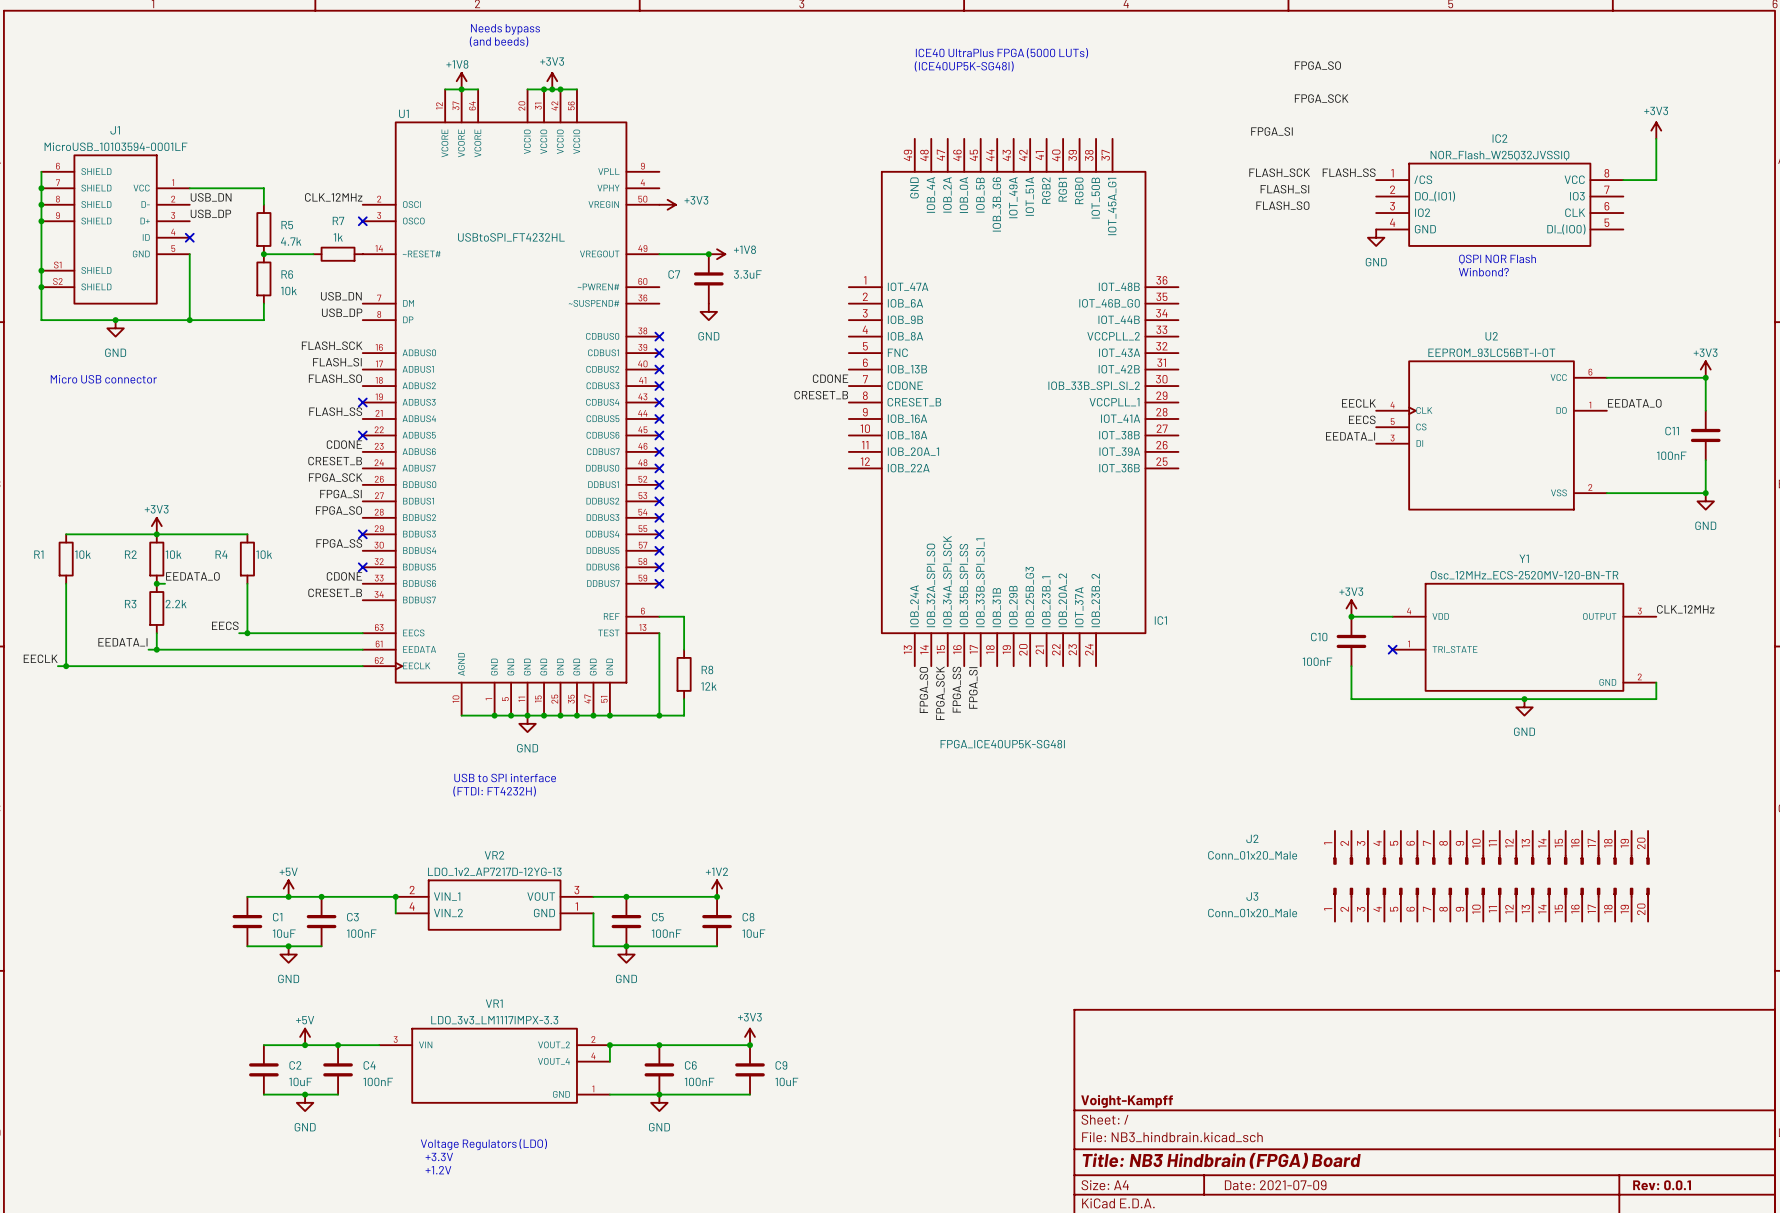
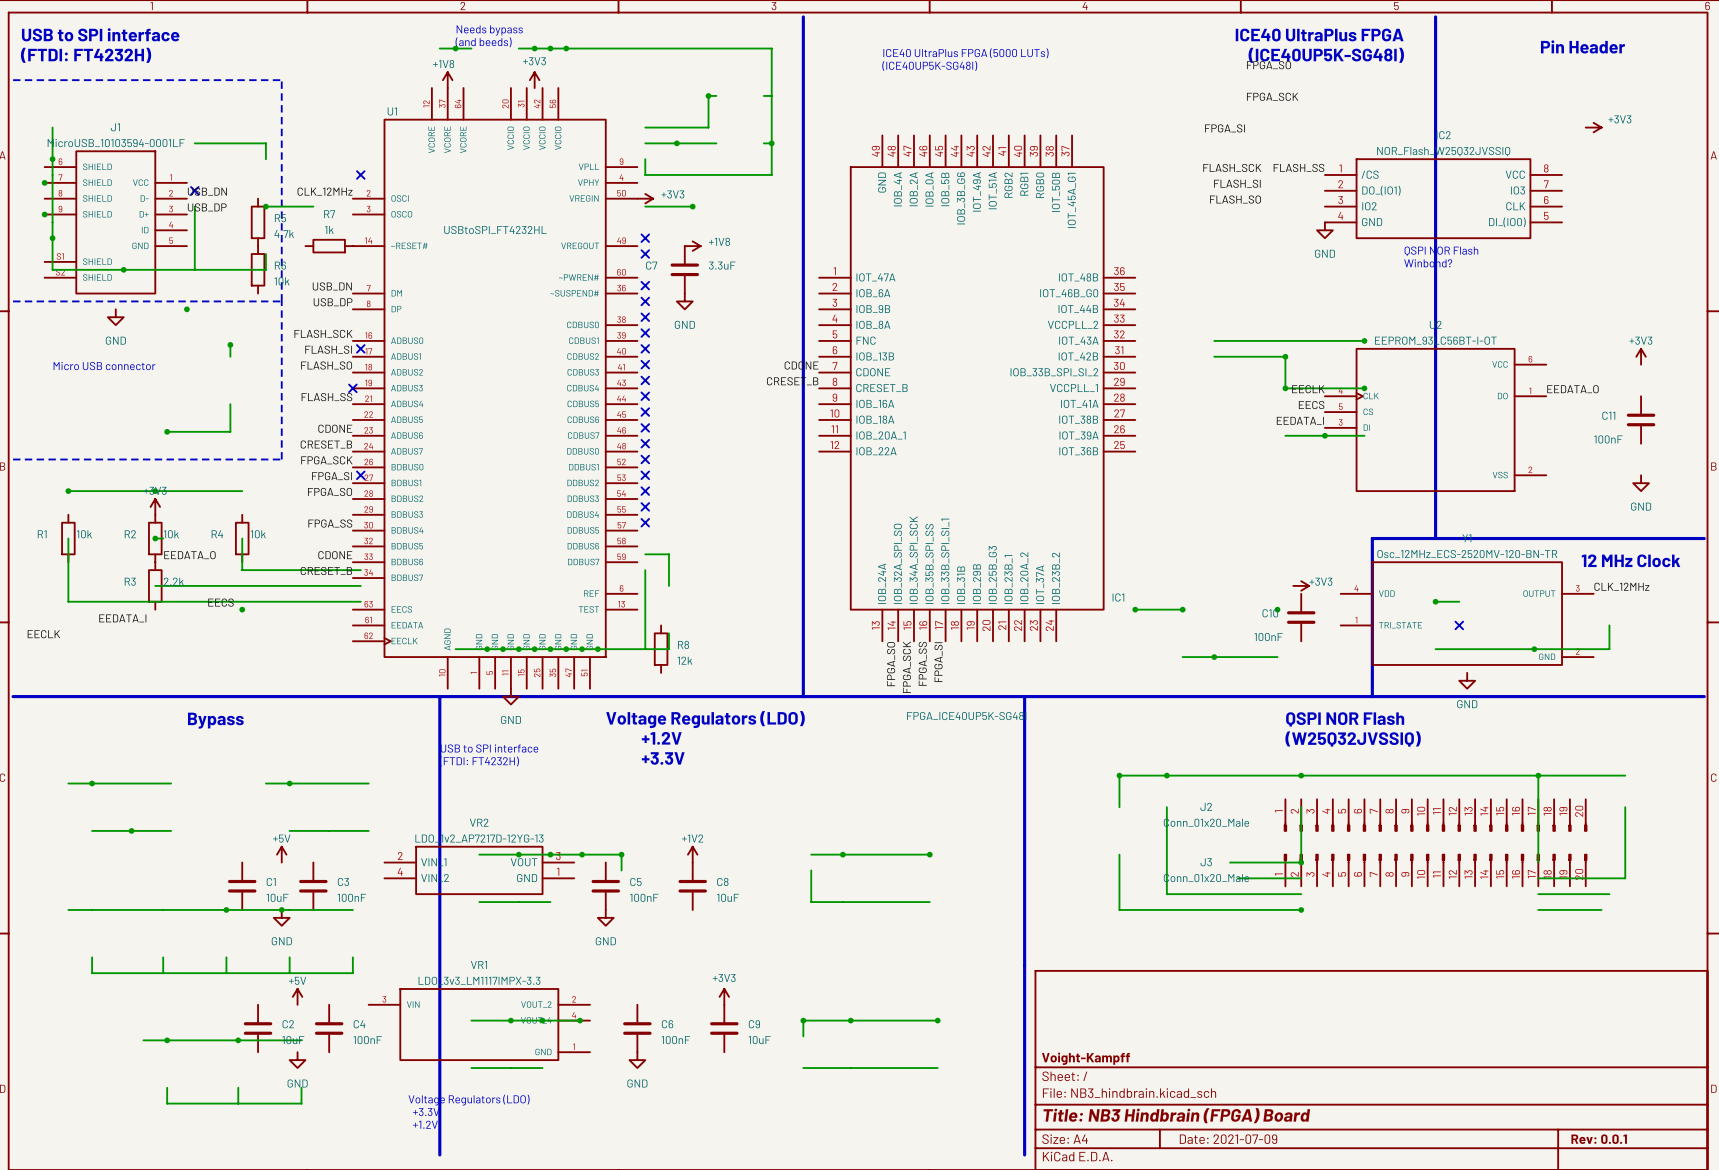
line: none -> (803, 16) (803, 696)
line: none -> (1435, 16) (1435, 538)
text: none -> USB to SPI interface (100, 34)
text: none -> ICE40 UltraPlus FPGA (1319, 35)
text: none -> Pin Header (1583, 46)
junction: none -> (455, 48)
wire: none -> (518, 48) (771, 48) (771, 174) (645, 174) (645, 159)
junction: none -> (534, 48)
junction: none -> (550, 48)
junction: none -> (566, 48)
text: none -> (FTDI: FT4232H) (86, 55)
text: none -> (ICE40UP5K-SG48I) (1326, 55)
line: none -> (13, 80) (281, 80) (281, 459) (13, 459)
wire: (445, 89) (478, 89) -> (439, 48) (471, 48)
junction: (461, 89) -> none
wire: (527, 89) (576, 89) -> none
junction: (544, 89) -> none
junction: (552, 89) -> none
junction: (560, 89) -> none
junction: none -> (708, 95)
wire: none -> (716, 95) (708, 95) (708, 127) (645, 127)
wire: none -> (763, 95) (771, 95)
power symbol rotation: 0° (1656, 130) -> 90° clockwise (1593, 127)
wire: (1656, 138) (1656, 180) (1623, 180) -> none
wire: none -> (645, 143) (716, 143)
junction: none -> (676, 143)
wire: none -> (763, 143) (771, 143)
junction: none -> (771, 143)
junction: none -> (52, 159)
wire: (41, 171) (41, 320) (263, 320) (263, 303) -> (52, 127) (52, 269) (265, 269) (265, 254)
no-connect mark: none -> (360, 174)
wire: (189, 188) (263, 188) (263, 204) -> (194, 143) (265, 143) (265, 159)
no-connect mark: none -> (194, 190)
junction: (41, 204) -> none
junction: none -> (265, 206)
junction: none -> (692, 206)
no-connect mark: (362, 221) -> none
no-connect mark: (189, 237) -> none
junction: none -> (52, 238)
no-connect mark: none -> (645, 238)
wire: (189, 254) (189, 320) -> (194, 206) (194, 269)
wire: (263, 254) (313, 254) -> (265, 206) (313, 206)
junction: (263, 254) -> none
wire: (659, 254) (708, 254) -> (645, 206) (692, 206)
junction: (708, 254) -> none
no-connect mark: none -> (645, 254)
junction: (41, 270) -> none
junction: none -> (123, 269)
junction: (41, 287) -> none
no-connect mark: none -> (645, 285)
line: none -> (13, 301) (281, 301)
no-connect mark: none -> (645, 301)
junction: (115, 320) -> none
no-connect mark: none -> (645, 317)
no-connect mark: (659, 336) -> none
no-connect mark: none -> (645, 333)
no-connect mark: (659, 353) -> none
wire: none -> (1214, 340) (1364, 340)
junction: none -> (1364, 340)
wire: none -> (230, 344) (230, 356)
junction: none -> (230, 344)
no-connect mark: none -> (360, 348)
no-connect mark: none -> (645, 348)
no-connect mark: (659, 369) -> none
wire: none -> (1214, 356) (1285, 356) (1285, 388) (1364, 388)
junction: none -> (1285, 356)
no-connect mark: none -> (645, 364)
wire: (1606, 377) (1705, 377) (1705, 410) -> none
junction: (1705, 377) -> none
no-connect mark: (659, 386) -> none
no-connect mark: none -> (645, 380)
no-connect mark: (659, 402) -> none
junction: none -> (1285, 388)
junction: none -> (1364, 388)
no-connect mark: none -> (645, 396)
wire: none -> (230, 404) (230, 431) (167, 431)
no-connect mark: (659, 418) -> none
no-connect mark: none -> (645, 412)
no-connect mark: (362, 435) -> none
no-connect mark: (659, 435) -> none
no-connect mark: none -> (645, 427)
junction: none -> (167, 431)
no-connect mark: (659, 451) -> none
wire: none -> (1285, 435) (1364, 435)
junction: none -> (1324, 435)
no-connect mark: none -> (645, 443)
wire: (1705, 460) (1705, 493) (1606, 493) -> none
no-connect mark: (659, 468) -> none
no-connect mark: none -> (645, 459)
no-connect mark: (659, 484) -> none
no-connect mark: none -> (360, 475)
no-connect mark: none -> (645, 475)
junction: (1705, 493) -> none
no-connect mark: (659, 501) -> none
junction: none -> (68, 491)
junction: none -> (155, 491)
no-connect mark: none -> (645, 491)
no-connect mark: (659, 517) -> none
no-connect mark: none -> (645, 506)
wire: (66, 534) (247, 534) -> (68, 491) (242, 491)
junction: (156, 534) -> none
no-connect mark: (362, 534) -> none
no-connect mark: (659, 534) -> none
no-connect mark: none -> (645, 522)
no-connect mark: (659, 550) -> none
wire: none -> (68, 538) (68, 562)
junction: none -> (155, 538)
wire: none -> (242, 538) (242, 562)
line: none -> (1704, 538) (1372, 538) (1372, 696)
no-connect mark: (362, 567) -> none
no-connect mark: (659, 567) -> none
text: none -> 12 MHz Clock (1630, 560)
wire: (156, 583) (165, 583) -> (155, 538) (163, 538)
junction: (156, 583) -> none
no-connect mark: (659, 583) -> none
wire: (247, 592) (247, 633) -> (242, 570) (360, 570)
power symbol rotation: 0° (1351, 608) -> 90° clockwise (1301, 585)
wire: (659, 616) (684, 616) (684, 649) -> (645, 554) (668, 554) (668, 585)
wire: (1351, 616) (1392, 616) -> none
junction position: (1351, 616) -> (1277, 609)
wire: (66, 624) (66, 666) -> (68, 601) (360, 601)
wire: none -> (1435, 601) (1459, 601)
junction: none -> (1435, 601)
wire: (156, 633) (156, 649) -> none
wire: (239, 633) (362, 633) -> none
wire: (659, 633) (659, 715) -> (645, 570) (645, 649)
wire: none -> (1135, 609) (1182, 609)
junction: none -> (1135, 609)
junction: none -> (1182, 609)
wire: (148, 649) (362, 649) -> (155, 585) (360, 585)
junction: (156, 649) -> none
no-connect mark: (1392, 649) -> none
no-connect mark: none -> (1459, 625)
wire: none -> (1609, 625) (1609, 649) (1435, 649)
wire: (57, 666) (362, 666) -> none
junction: (66, 666) -> none
wire: (1351, 666) (1351, 699) (1656, 699) (1656, 682) -> none
junction: none -> (487, 649)
junction: none -> (503, 649)
junction: none -> (518, 649)
junction: none -> (534, 649)
junction: none -> (550, 649)
junction: none -> (566, 649)
junction: none -> (582, 649)
junction: none -> (597, 649)
junction: none -> (1534, 649)
wire: none -> (1182, 657) (1277, 657)
junction: none -> (1214, 657)
wire: (684, 699) (684, 715) (461, 715) -> (668, 633) (668, 649) (455, 649)
junction: (1524, 699) -> none
junction: (494, 715) -> none
junction: (511, 715) -> none
junction: (527, 715) -> none
junction: (544, 715) -> none
junction: (560, 715) -> none
junction: (576, 715) -> none
junction: (593, 715) -> none
junction: (609, 715) -> none
junction: (659, 715) -> none
line: none -> (13, 696) (1704, 696)
line: none -> (439, 696) (439, 1154)
line: none -> (1024, 696) (1024, 1154)
text: none -> Voltage Regulators (LDO) (705, 719)
text: none -> QSPI NOR Flash (1345, 719)
text: none -> Bypass (215, 720)
text: none -> +1.2V (661, 738)
text: none -> (W25Q32JVSSIQ) (1353, 738)
text: none -> +3.3V (663, 758)
junction: none -> (1119, 775)
junction: none -> (1166, 775)
junction: none -> (1301, 775)
wire: none -> (1538, 775) (1538, 862)
junction: none -> (1538, 775)
wire: none -> (1625, 775) (1119, 775) (1119, 807)
wire: none -> (68, 783) (171, 783)
junction: none -> (92, 783)
wire: none -> (265, 783) (368, 783)
junction: none -> (289, 783)
wire: none -> (1166, 807) (1166, 894) (1301, 894)
wire: none -> (1301, 807) (1301, 862) (1230, 862)
wire: none -> (1625, 807) (1625, 878) (1538, 878)
wire: none -> (92, 830) (171, 830)
junction: none -> (131, 830)
wire: none -> (289, 830) (368, 830)
wire: none -> (479, 854) (621, 854) (621, 870)
junction: none -> (518, 854)
junction: none -> (550, 854)
junction: none -> (582, 854)
junction: none -> (621, 854)
wire: none -> (811, 854) (929, 854)
junction: none -> (842, 854)
junction: none -> (929, 854)
wire: none -> (1119, 854) (1119, 909) (1301, 909)
wire: (247, 896) (395, 896) (395, 913) -> none
junction: (288, 896) -> none
junction: (321, 896) -> none
junction: (395, 896) -> none
wire: (593, 896) (717, 896) -> none
junction: (626, 896) -> none
junction: (717, 896) -> none
junction: none -> (1301, 862)
wire: none -> (811, 870) (811, 902) (929, 902)
wire: (593, 913) (593, 946) (717, 946) -> none
wire: none -> (1238, 878) (1301, 878)
wire: none -> (1538, 894) (1609, 894)
wire: none -> (479, 902) (550, 902)
wire: none -> (68, 909) (242, 909)
junction: none -> (226, 909)
wire: none -> (313, 909) (352, 909)
junction: (626, 946) -> none
junction: none -> (1301, 909)
wire: none -> (1538, 909) (1601, 909)
wire: none -> (92, 957) (92, 973) (352, 973) (352, 957)
wire: none -> (163, 957) (163, 973)
wire: none -> (226, 957) (226, 973)
wire: none -> (289, 957) (289, 973)
wire: (263, 1045) (379, 1045) -> none
junction: (305, 1045) -> none
junction: (338, 1045) -> none
junction position: (609, 1045) -> (580, 1020)
junction: (659, 1045) -> none
wire: (750, 1045) (609, 1045) (609, 1061) -> none
junction: (750, 1045) -> none
wire: none -> (471, 1020) (582, 1020)
junction: none -> (510, 1020)
junction: none -> (542, 1020)
junction: none -> (803, 1020)
junction: none -> (850, 1020)
wire: none -> (937, 1020) (803, 1020) (803, 1036)
junction: none -> (937, 1020)
wire: none -> (143, 1040) (301, 1040)
junction: none -> (167, 1040)
junction: none -> (238, 1040)
wire: (263, 1094) (338, 1094) -> none
junction: (305, 1094) -> none
wire: (609, 1094) (750, 1094) -> none
junction: (659, 1094) -> none
wire: none -> (471, 1068) (542, 1068)
wire: none -> (803, 1068) (937, 1068)
wire: none -> (167, 1087) (167, 1103) (301, 1103) (301, 1087)
wire: none -> (238, 1087) (238, 1103)

